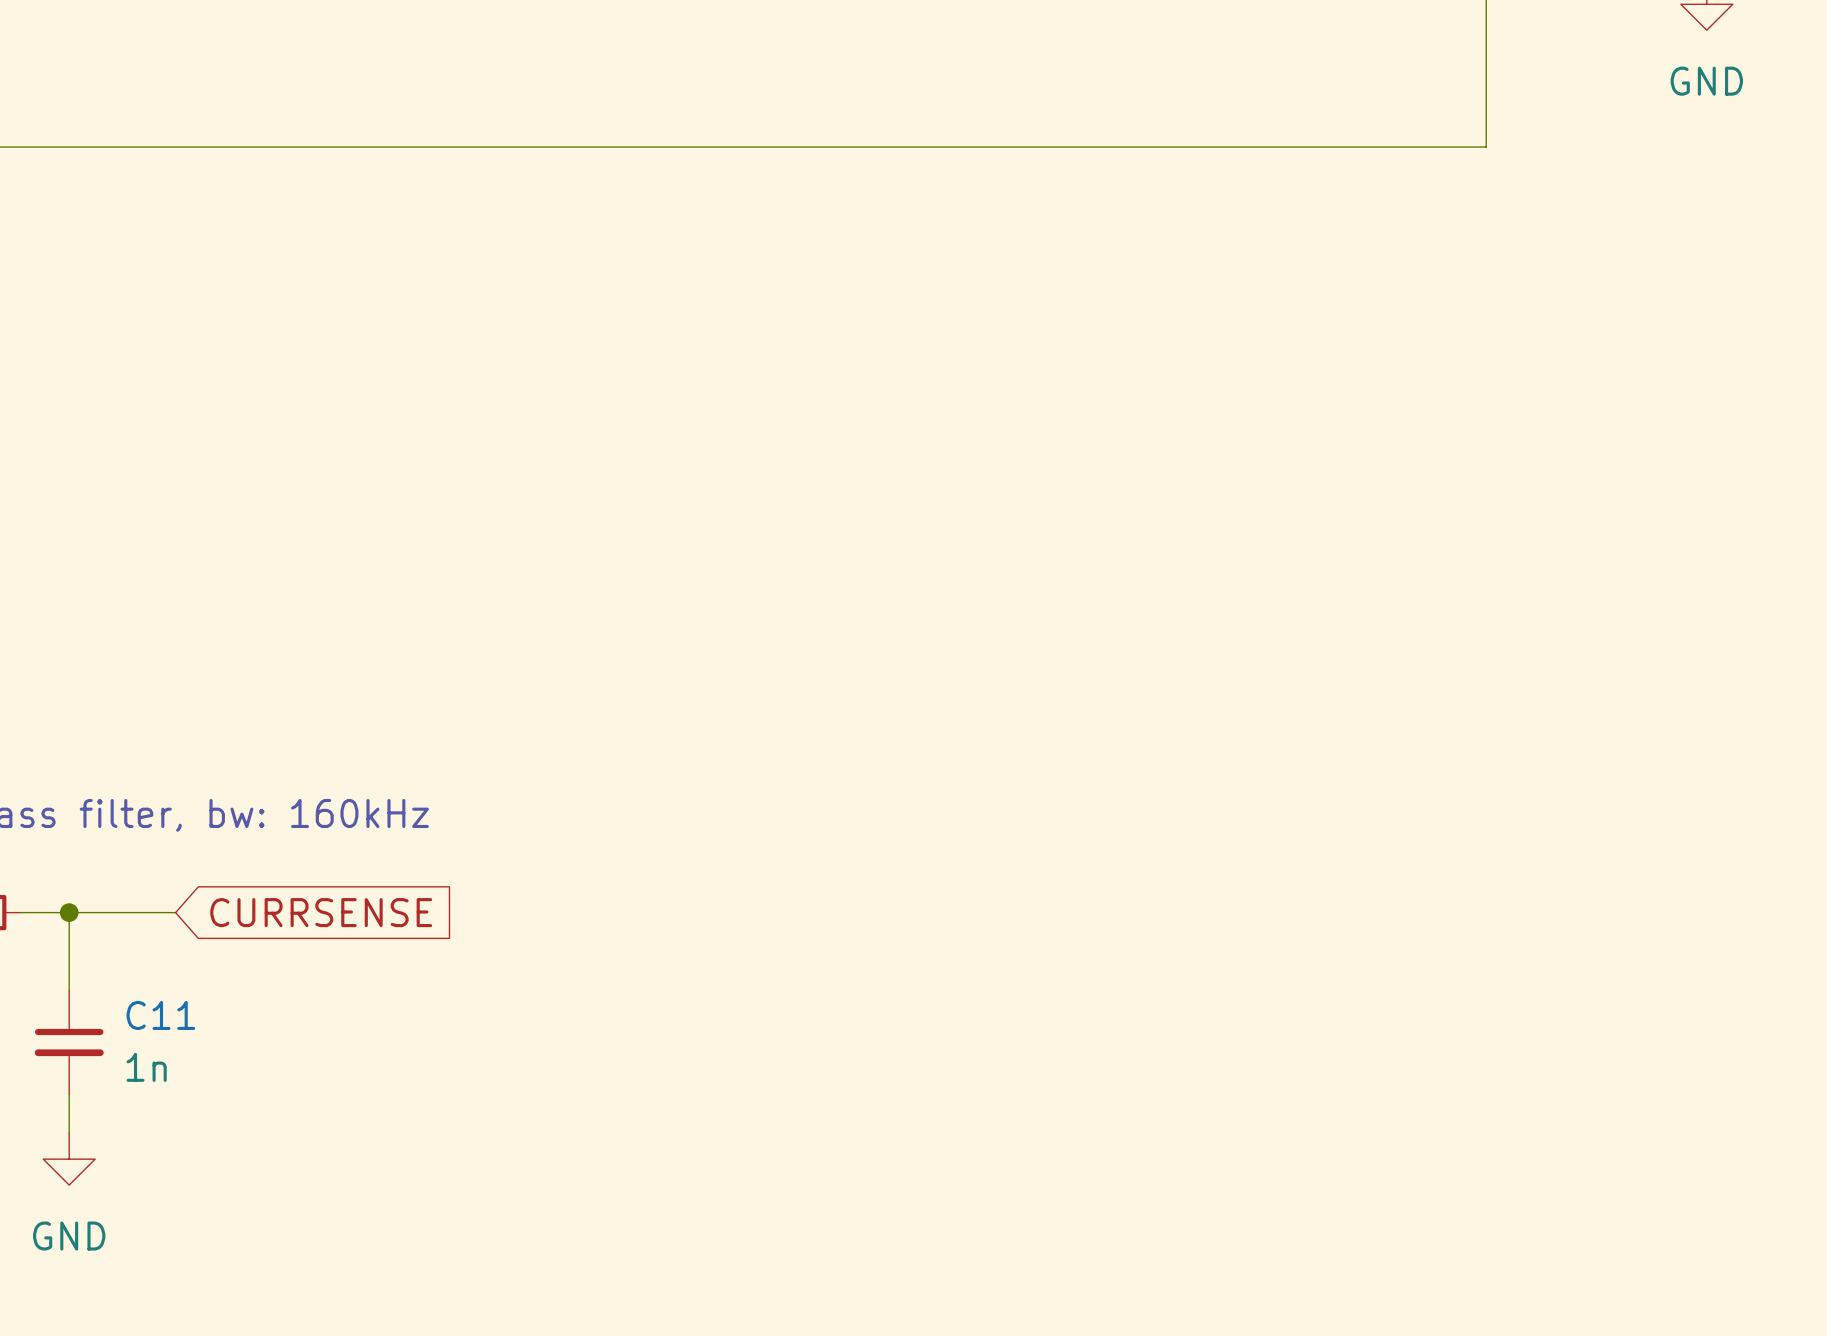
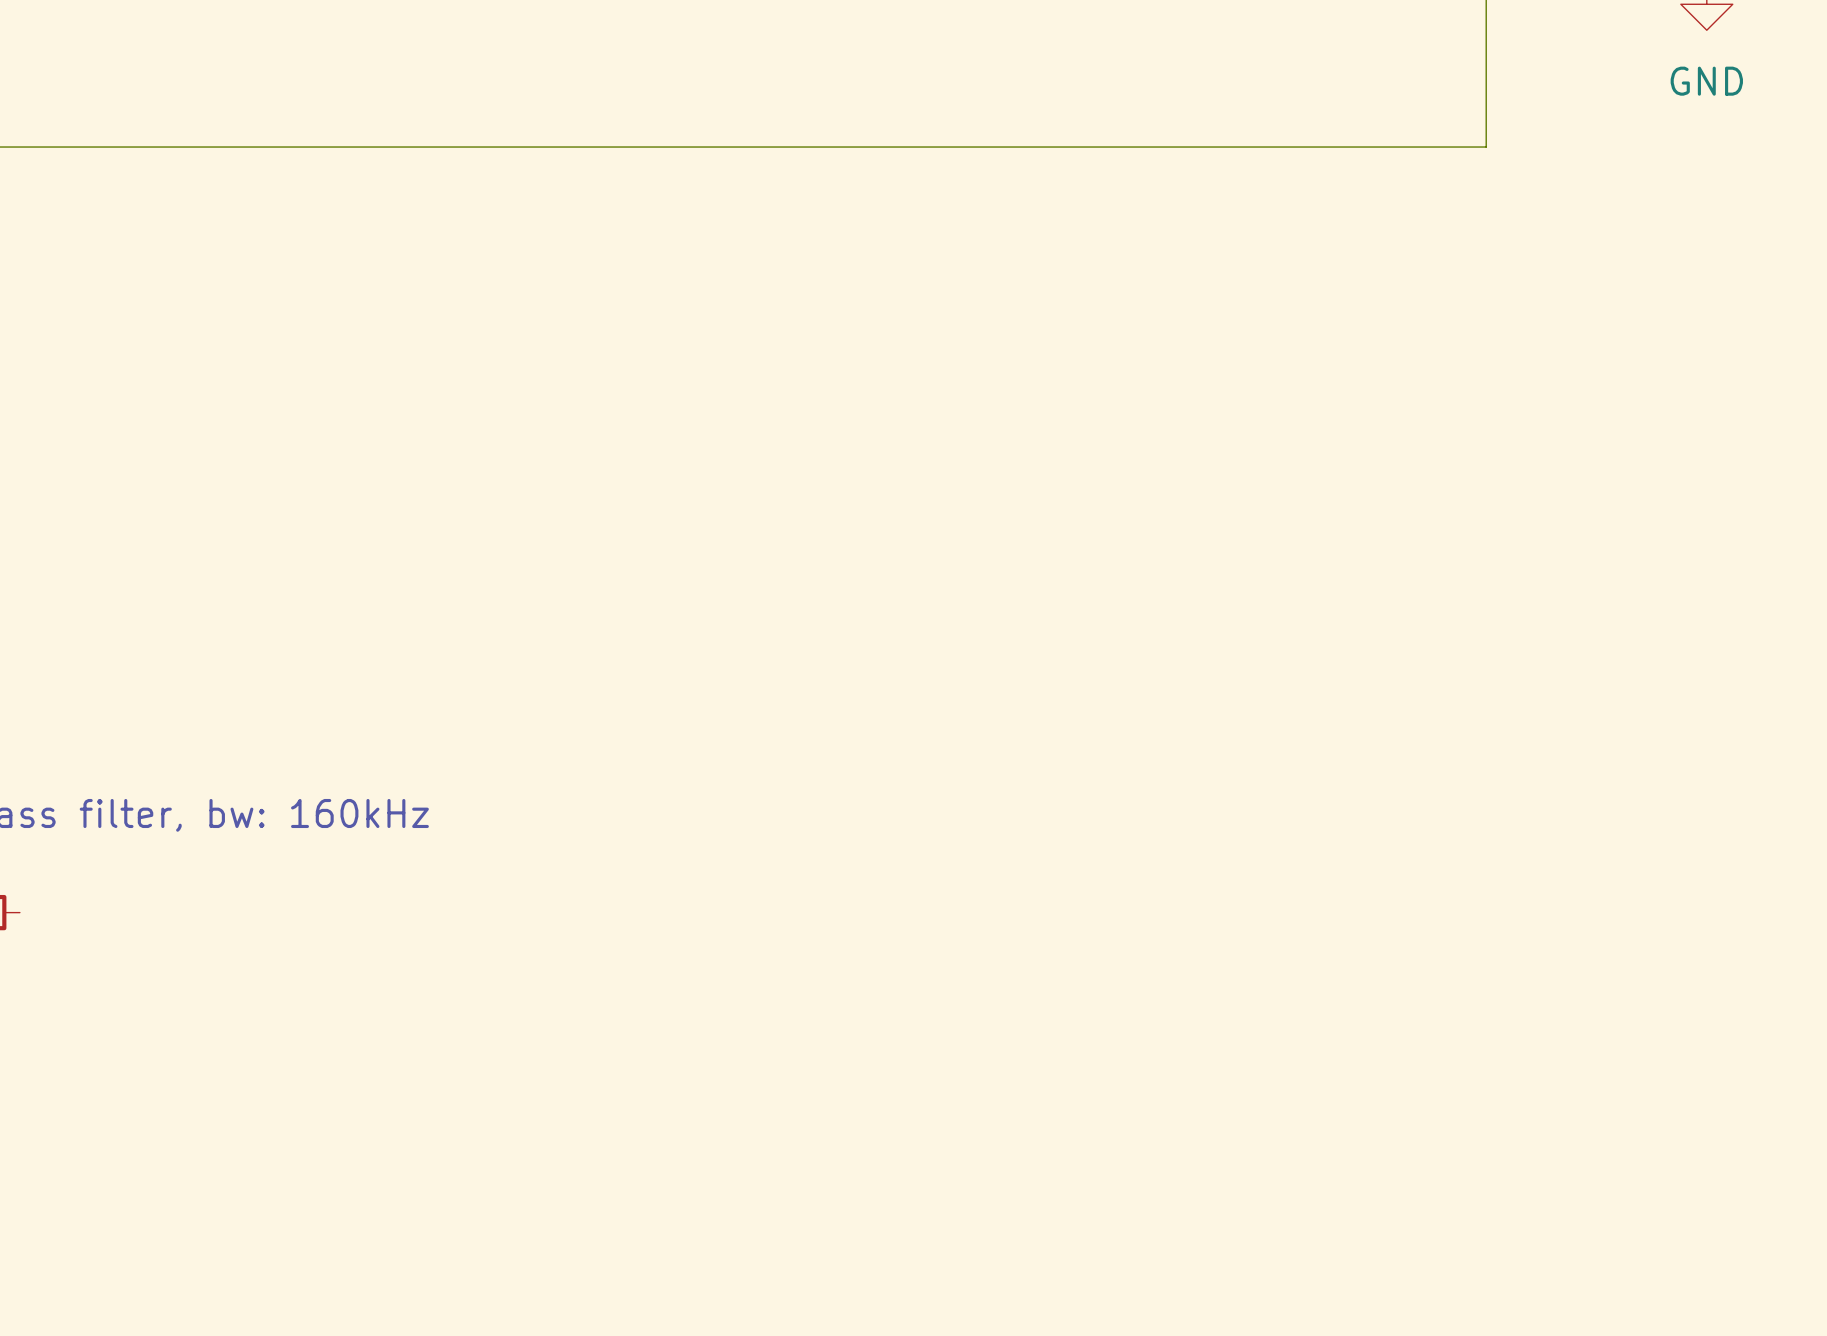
wire: (19, 912) (175, 912) -> none
wire: (69, 912) (69, 990) -> none
junction: (69, 912) -> none
global label: CURRSENSE (321, 912) -> none
C11: 1n (69, 1042) -> none
wire: (69, 1094) (69, 1133) -> none
power symbol: GND (69, 1159) -> none

